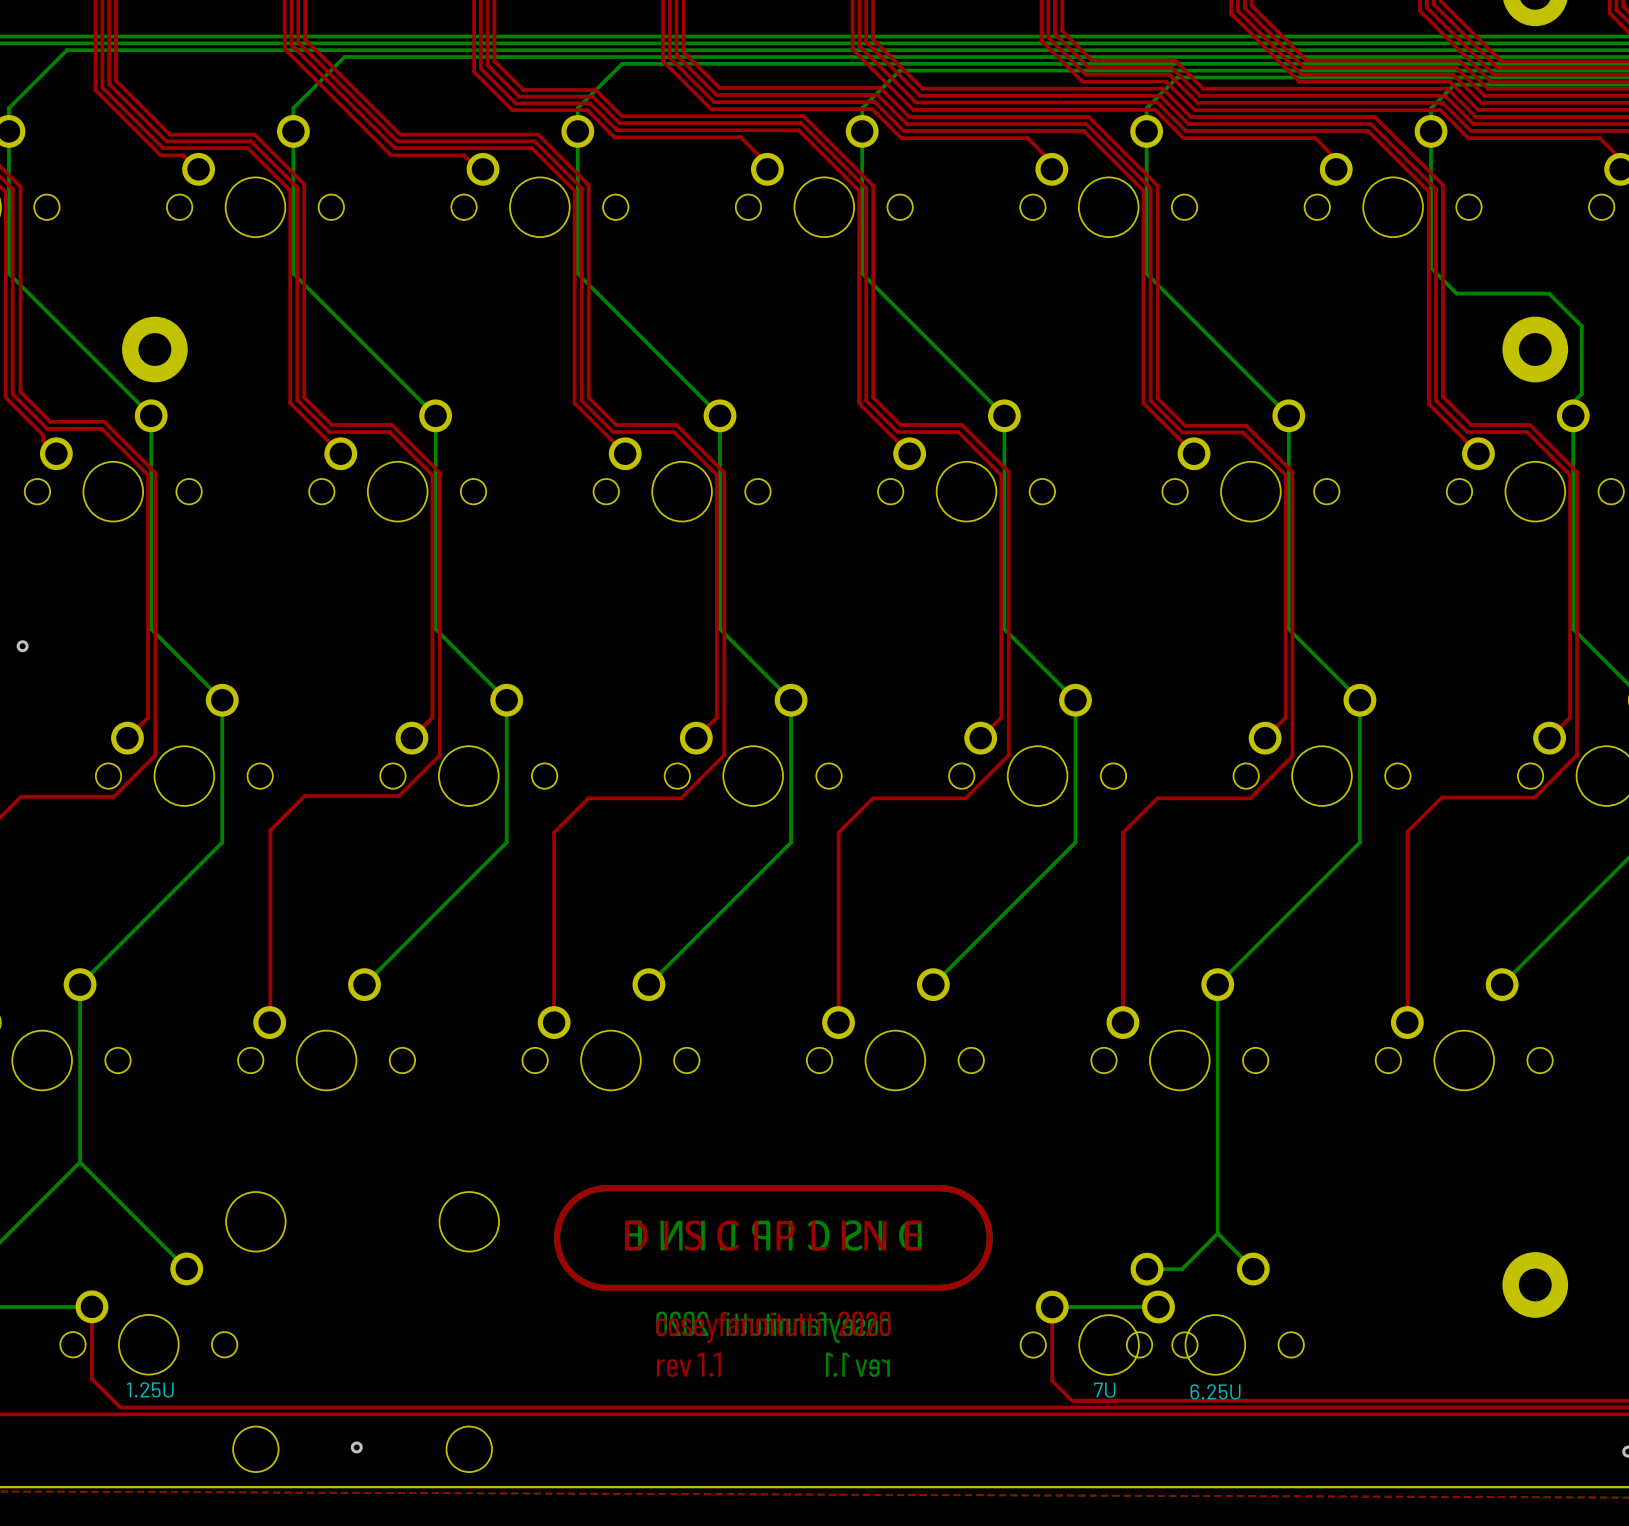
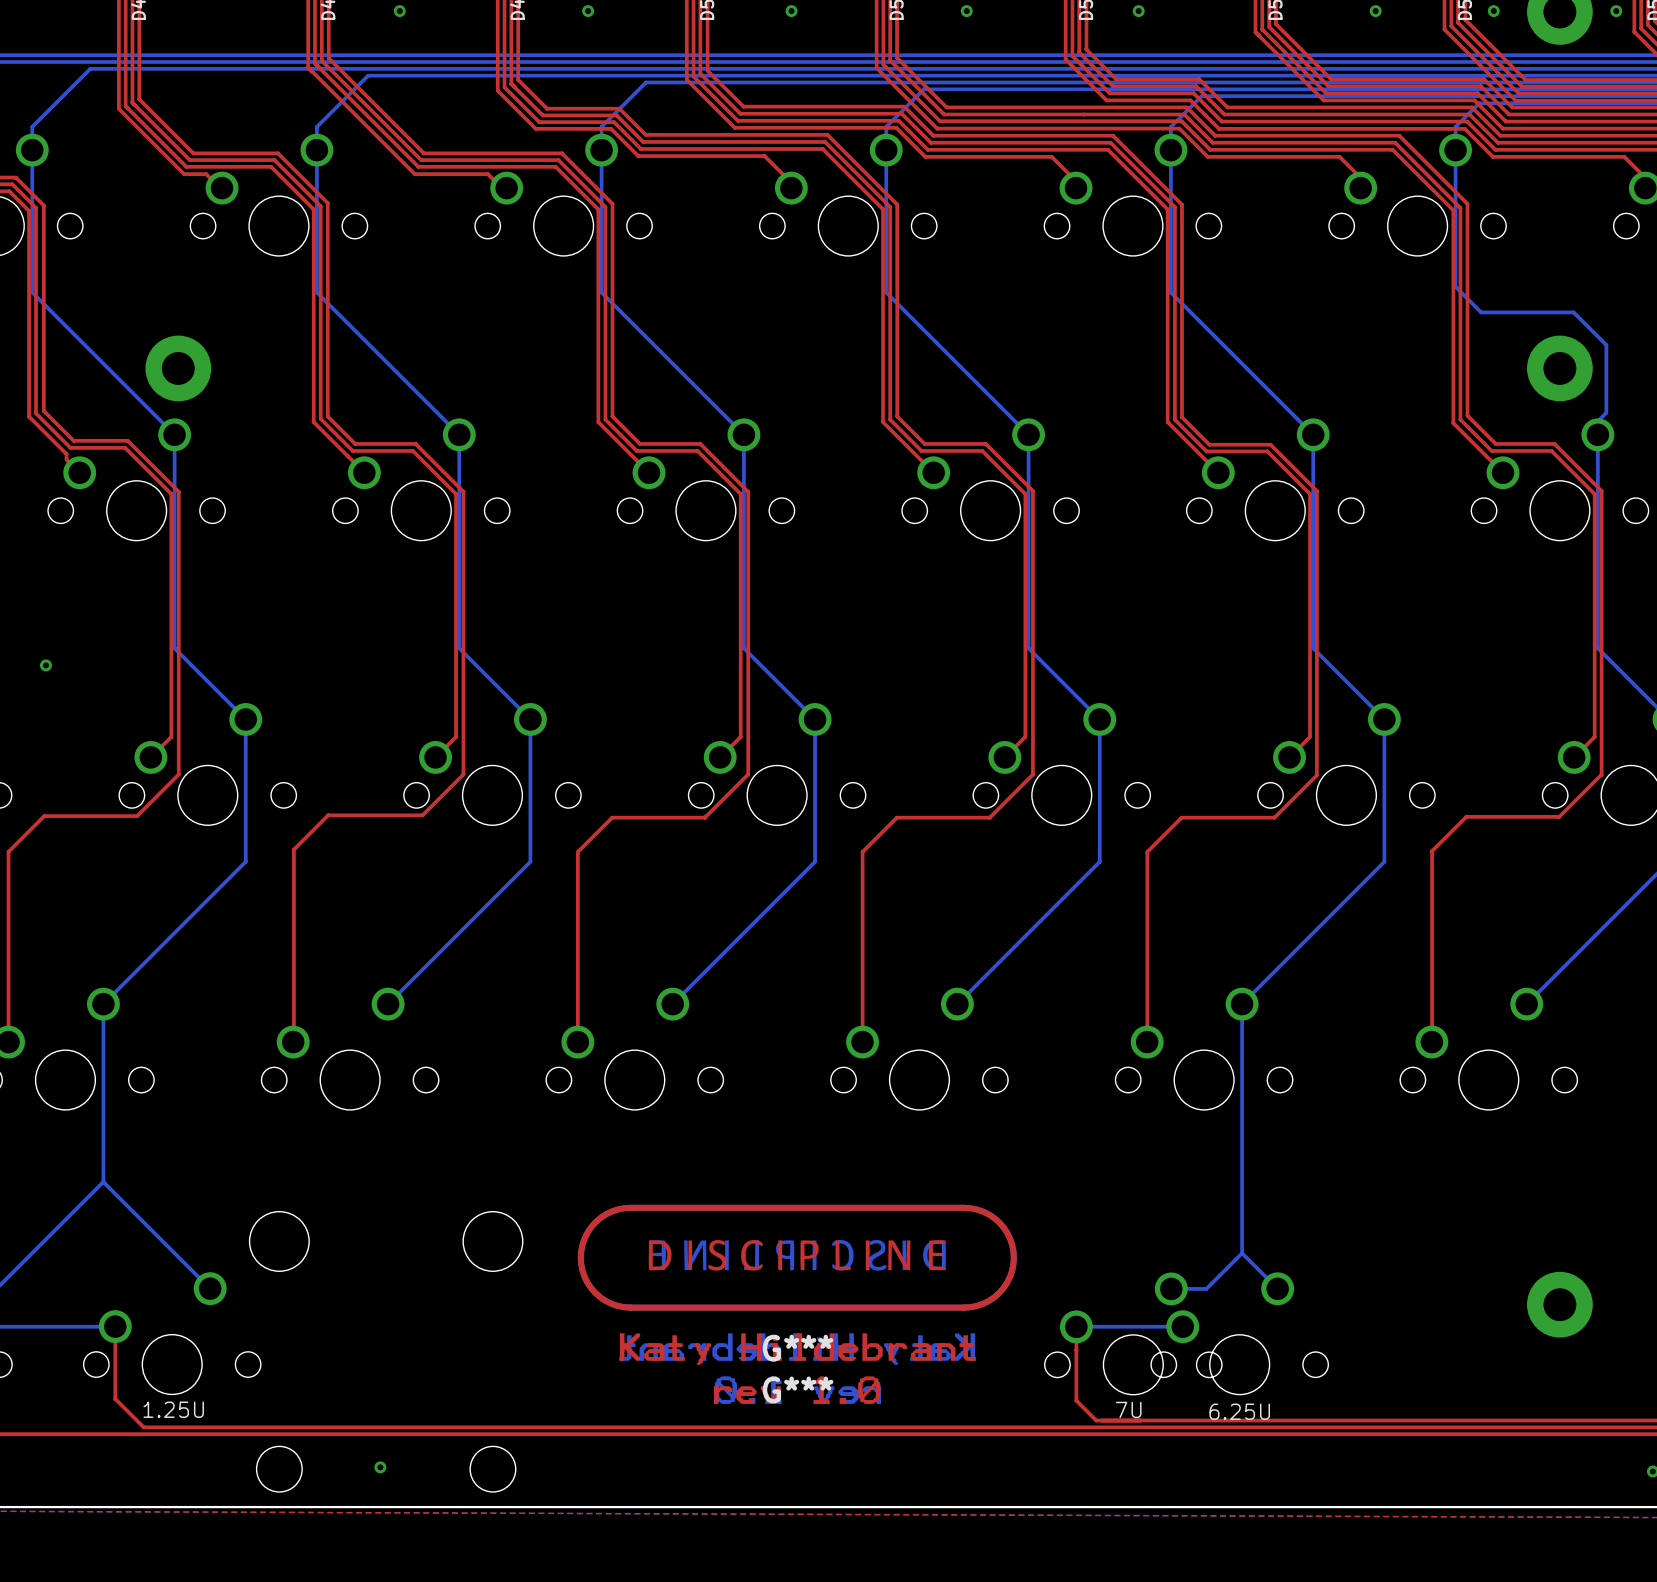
drawing: [656, 1311, 891, 1377] -> none
drawing: none -> [619, 1333, 976, 1404]
G***: none -> (797, 1349)
G***: none -> (797, 1390)

